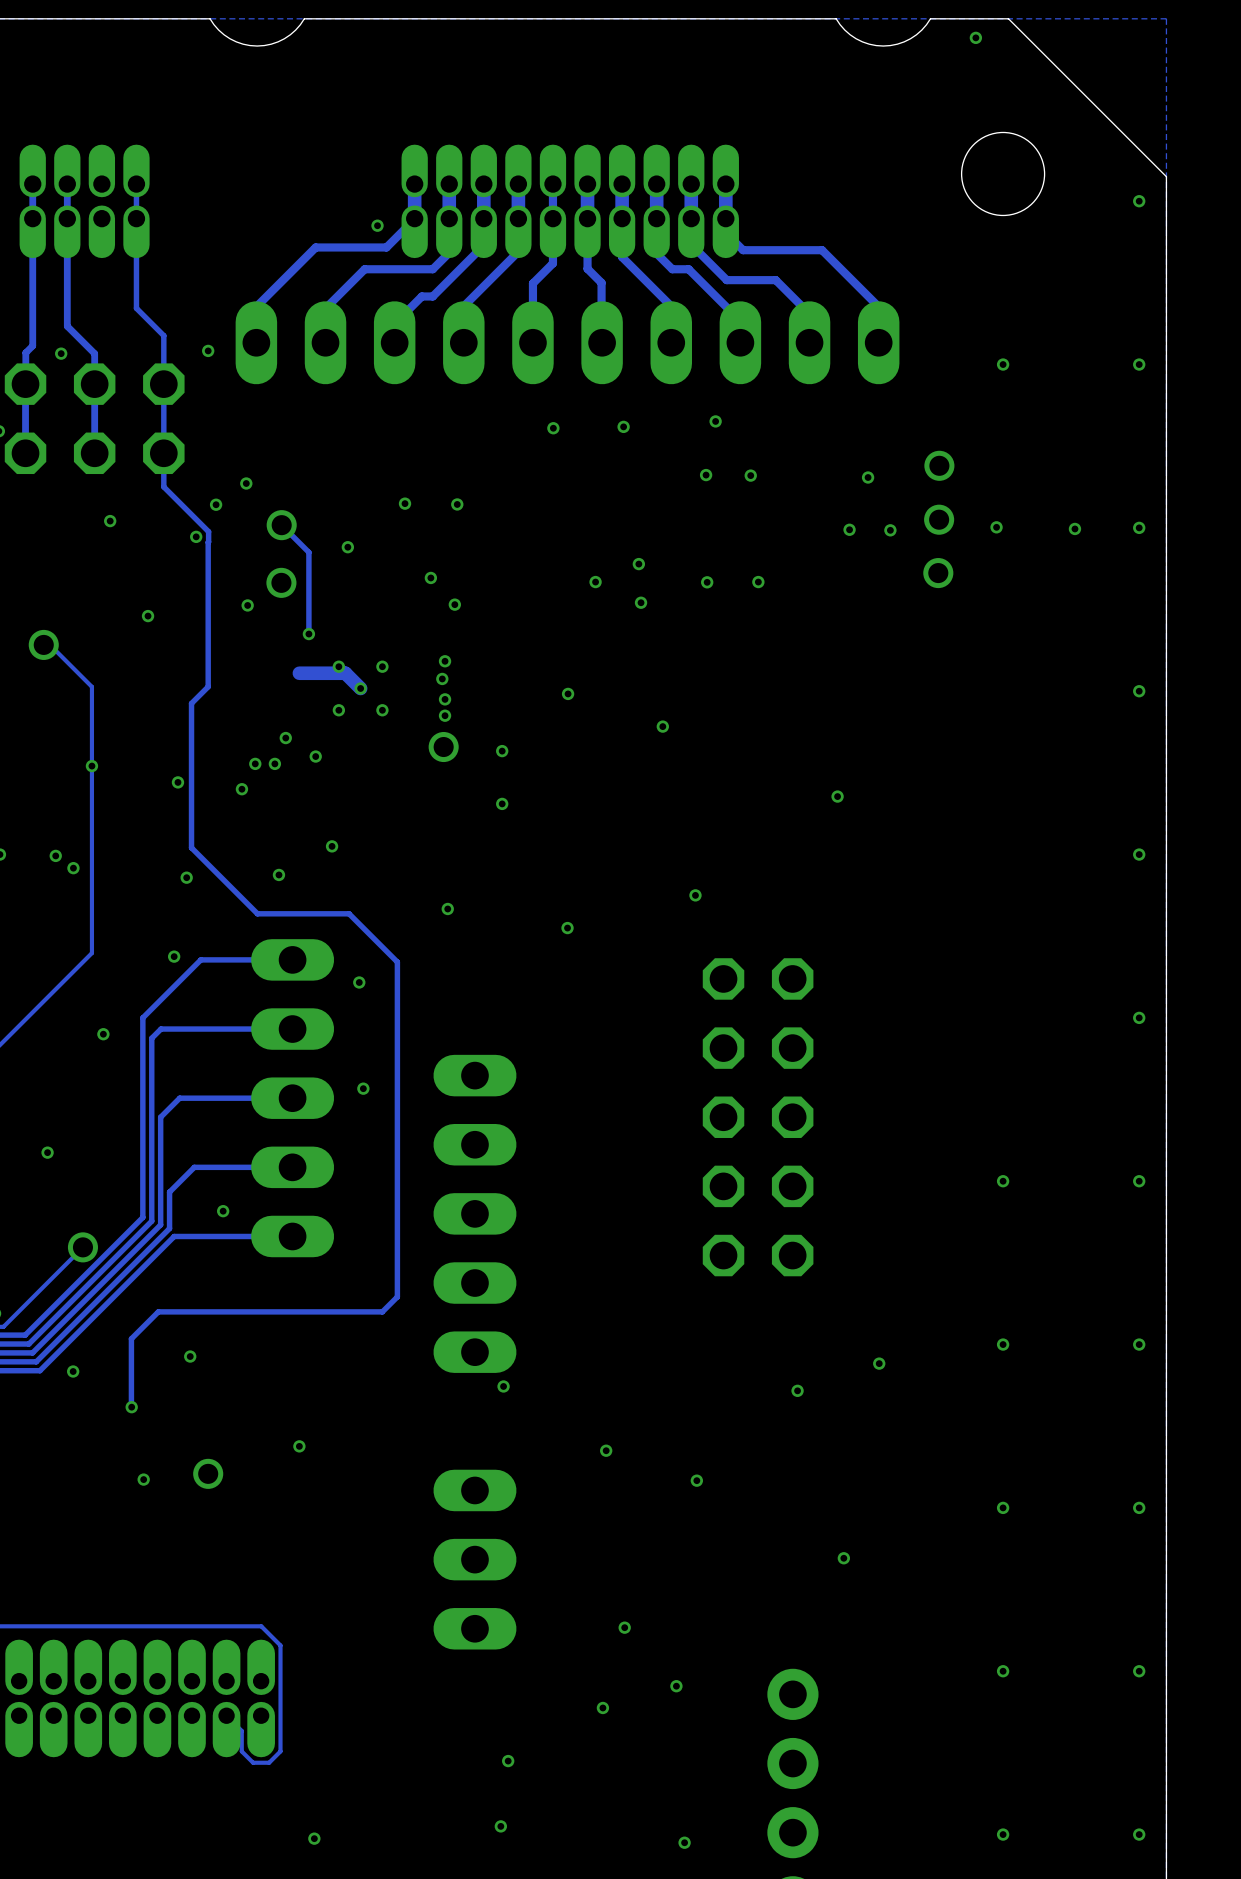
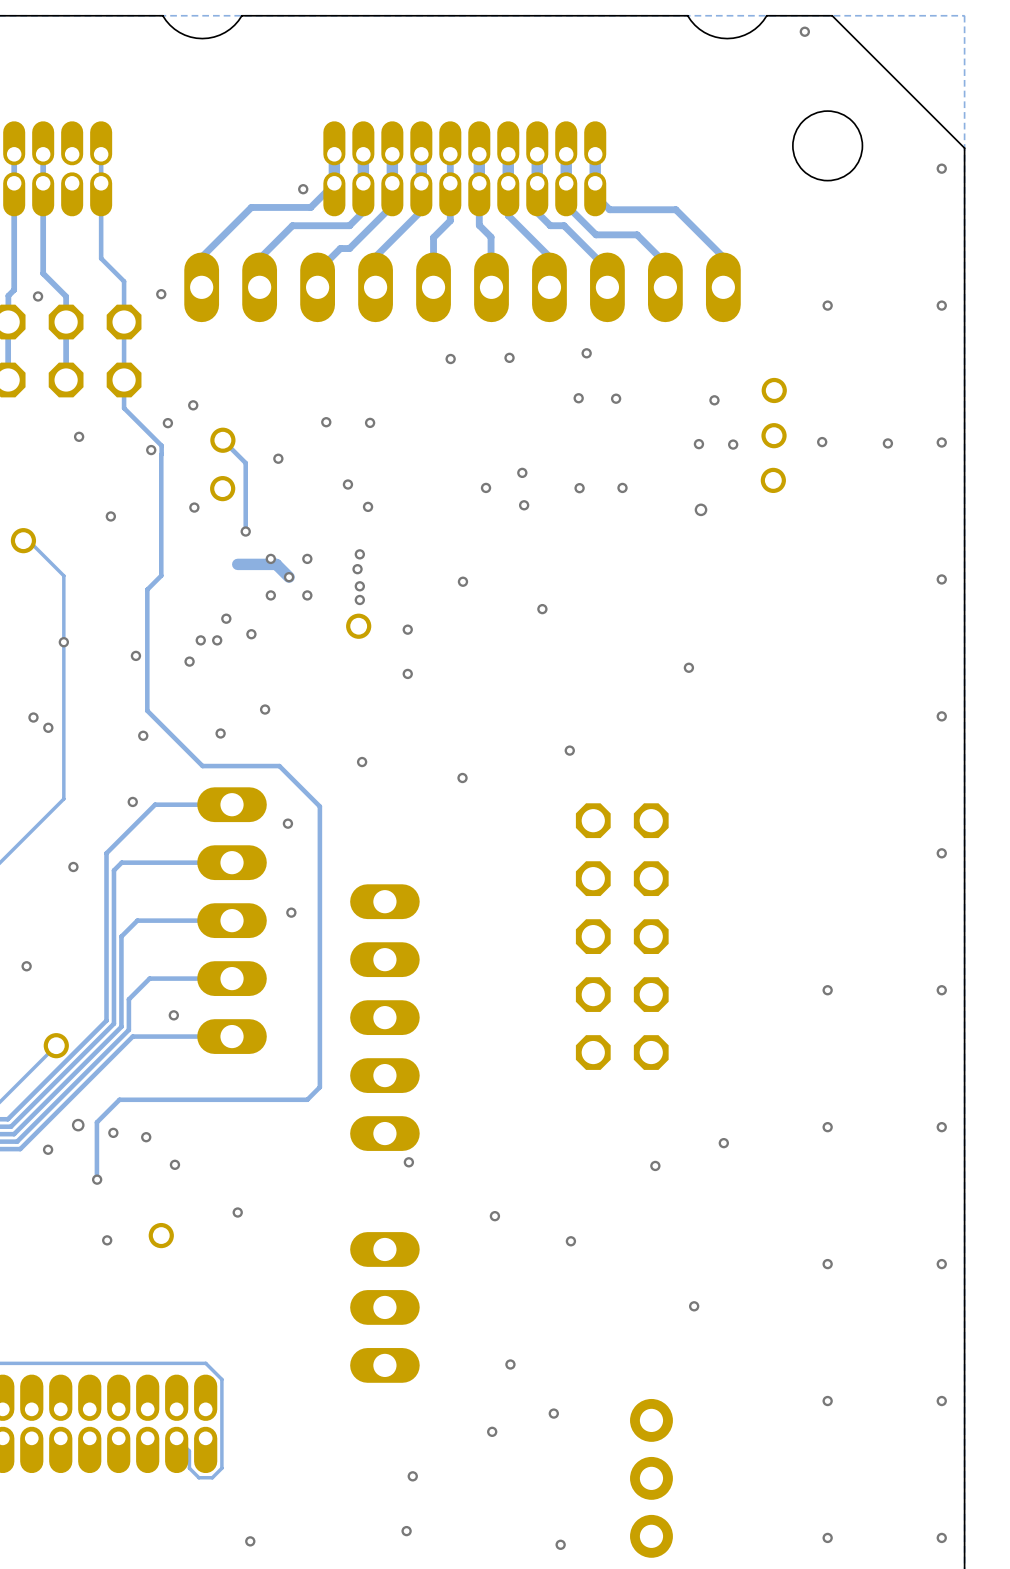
via: none -> (701, 509)
via: none -> (78, 1125)
via: none -> (113, 1132)
via: none -> (174, 1164)

